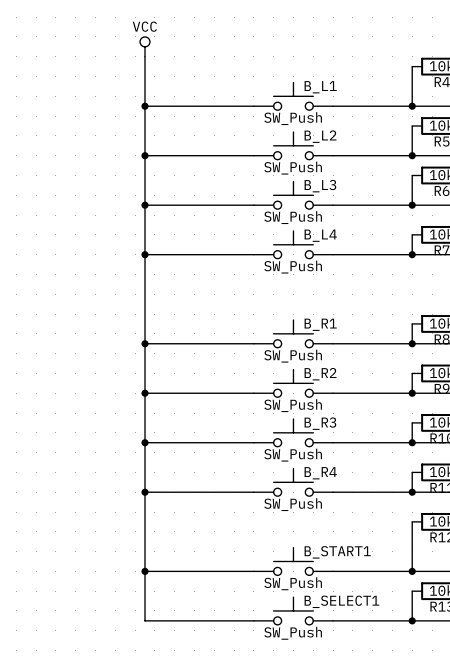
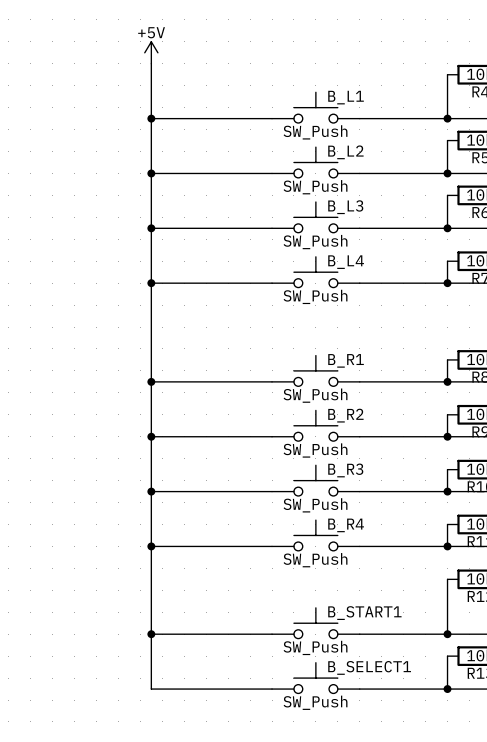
power symbol: VCC (145, 46) -> +5V (151, 52)

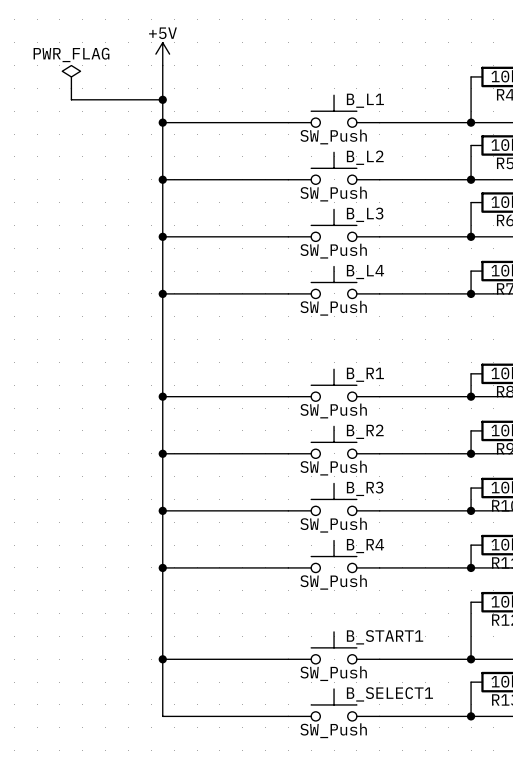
power symbol: none -> PWR_FLAG (71, 76)
wire: none -> (71, 88) (71, 99) (162, 99)
junction: none -> (162, 99)

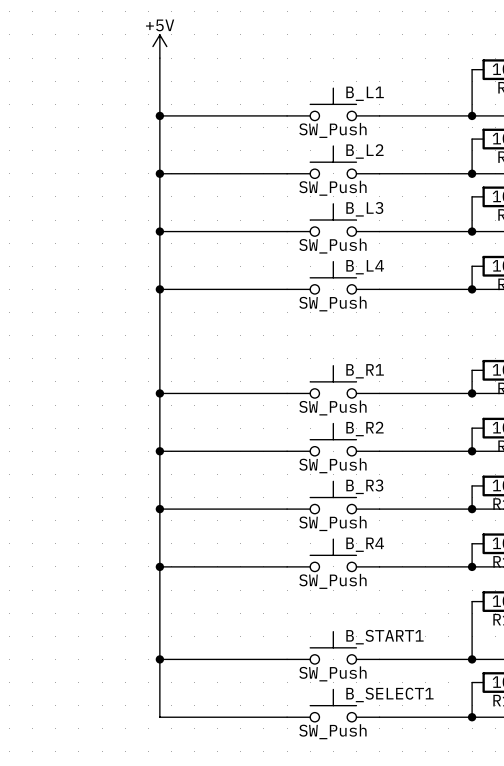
power symbol: PWR_FLAG (71, 76) -> none
wire: (71, 88) (71, 99) (162, 99) -> none
junction: (162, 99) -> none

